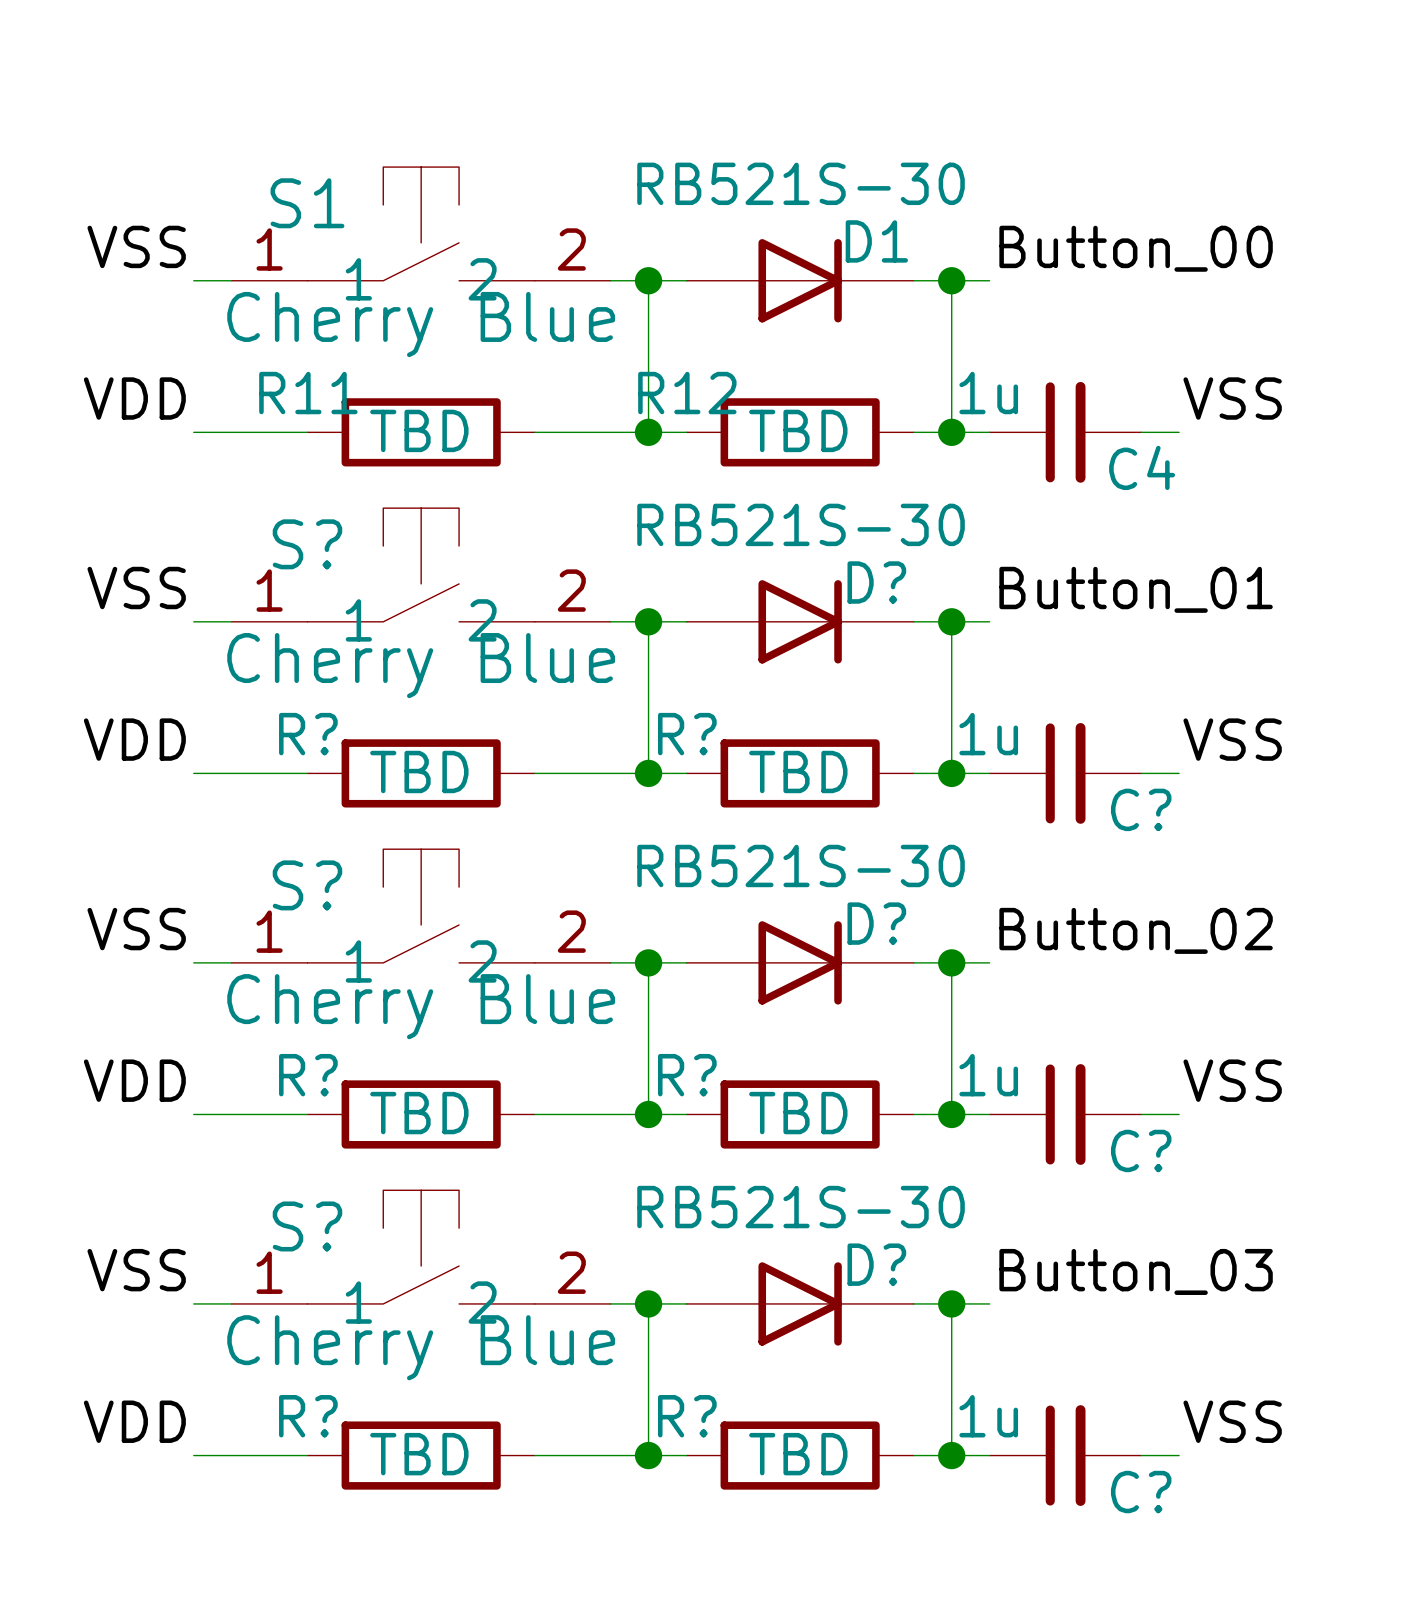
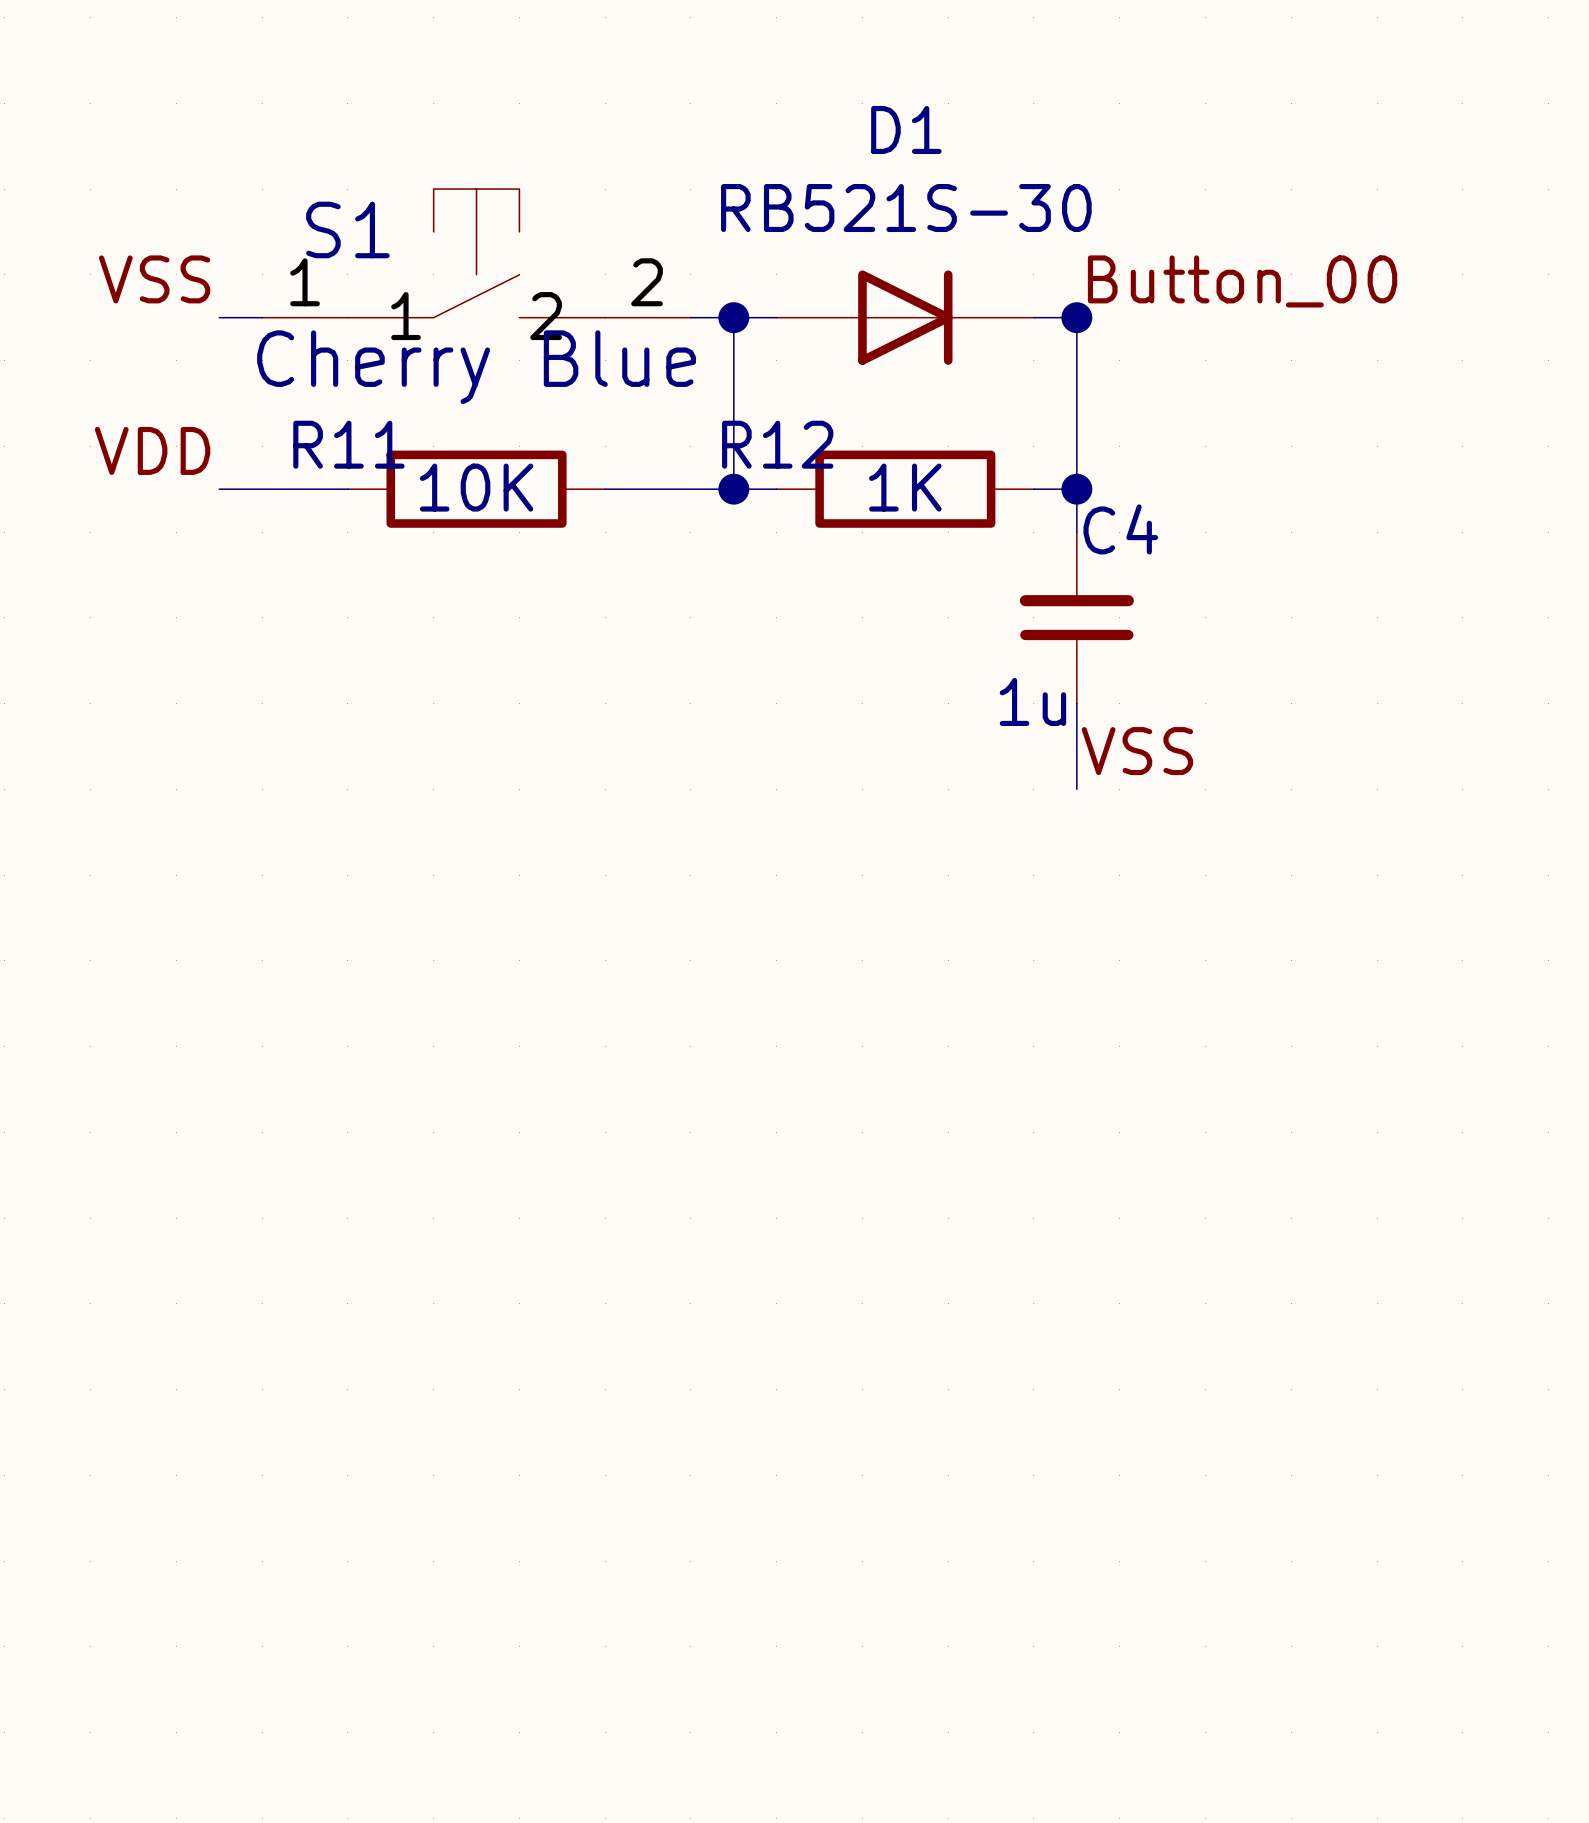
D1 name position: D1 (876, 241) -> D1 (906, 129)
label position: Button_00 (1136, 248) -> Button_00 (1242, 281)
wire: (951, 280) (989, 280) -> none
label: VSS (1232, 398) -> none
R11 value: TBD (419, 430) -> 10K (476, 487)
R12 value: TBD (798, 430) -> 1K (905, 487)
wire: (951, 432) (989, 432) -> (1076, 489) (1076, 532)
C4 rotation: 0° (1065, 432) -> 90° counterclockwise (1076, 617)
C4 position: (1065, 432) -> (1076, 617)
wire: (1141, 432) (1179, 432) -> none
S?: Cherry Blue (421, 564) -> none
label: VSS (136, 588) -> none
label: Button_01 (1136, 589) -> none
wire: (193, 621) (231, 621) -> none
wire: (610, 621) (686, 621) -> none
wire: (648, 621) (648, 773) -> none
junction: (648, 621) -> none
D?: RB521S-30 (800, 621) -> none
wire: (913, 621) (989, 621) -> none
junction: (951, 621) -> none
label: none -> VSS (1137, 751)
wire: (951, 697) (951, 773) -> none
label: VDD (134, 739) -> none
label: VSS (1232, 739) -> none
wire: (193, 773) (307, 773) -> none
R?: TBD (421, 773) -> none
wire: (534, 773) (686, 773) -> none
junction: (648, 773) -> none
R?: TBD (800, 773) -> none
wire: (913, 773) (989, 773) -> none
junction: (951, 773) -> none
C?: 1u (1065, 773) -> none
wire: (1141, 773) (1179, 773) -> none
S?: Cherry Blue (421, 906) -> none
label: VSS (136, 929) -> none
label: Button_02 (1136, 930) -> none
wire: (193, 962) (231, 962) -> none
wire: (610, 962) (686, 962) -> none
wire: (648, 962) (648, 1114) -> none
junction: (648, 962) -> none
D?: RB521S-30 (800, 962) -> none
wire: (913, 962) (989, 962) -> none
wire: (951, 962) (951, 1114) -> none
junction: (951, 962) -> none
label: VDD (134, 1080) -> none
label: VSS (1232, 1080) -> none
wire: (193, 1114) (307, 1114) -> none
R?: TBD (421, 1114) -> none
wire: (534, 1114) (686, 1114) -> none
junction: (648, 1114) -> none
R?: TBD (800, 1114) -> none
wire: (913, 1114) (989, 1114) -> none
junction: (951, 1114) -> none
C?: 1u (1065, 1114) -> none
wire: (1141, 1114) (1179, 1114) -> none
S?: Cherry Blue (421, 1247) -> none
label: VSS (136, 1270) -> none
label: Button_03 (1136, 1271) -> none
wire: (193, 1303) (231, 1303) -> none
wire: (610, 1303) (686, 1303) -> none
wire: (648, 1303) (648, 1455) -> none
junction: (648, 1303) -> none
D?: RB521S-30 (800, 1303) -> none
wire: (913, 1303) (989, 1303) -> none
wire: (951, 1303) (951, 1455) -> none
junction: (951, 1303) -> none
label: VDD (134, 1421) -> none
label: VSS (1232, 1421) -> none
wire: (193, 1455) (307, 1455) -> none
R?: TBD (421, 1455) -> none
wire: (534, 1455) (686, 1455) -> none
junction: (648, 1455) -> none
R?: TBD (800, 1455) -> none
wire: (913, 1455) (989, 1455) -> none
junction: (951, 1455) -> none
C?: 1u (1065, 1455) -> none
wire: (1141, 1455) (1179, 1455) -> none

